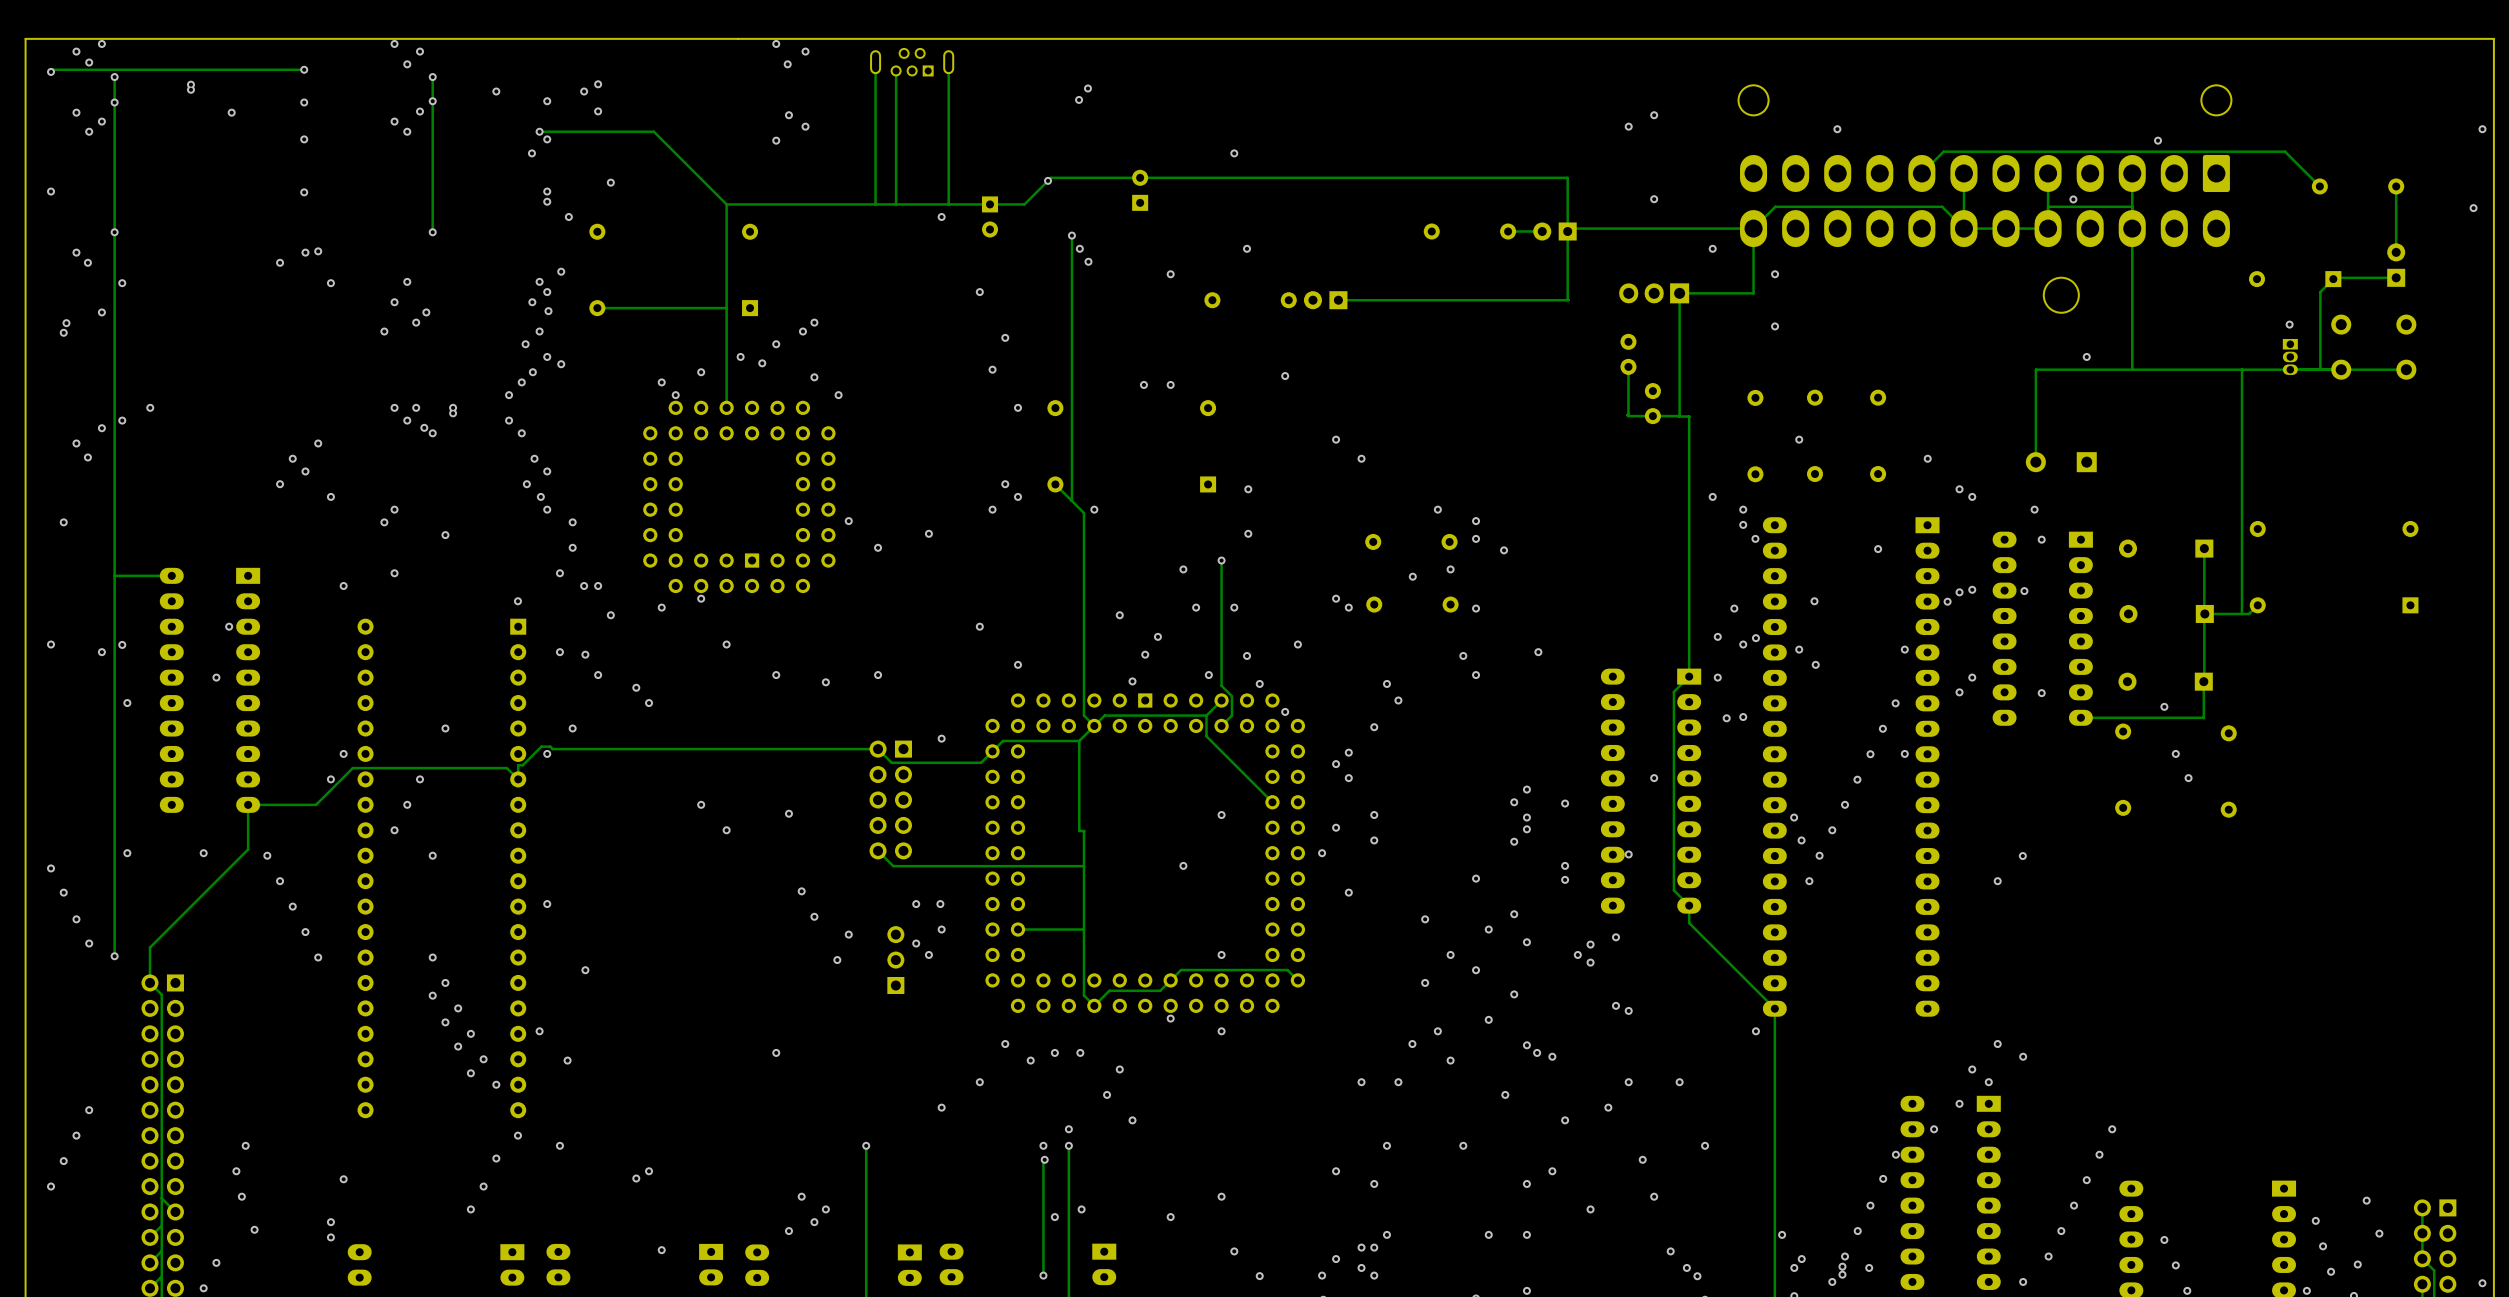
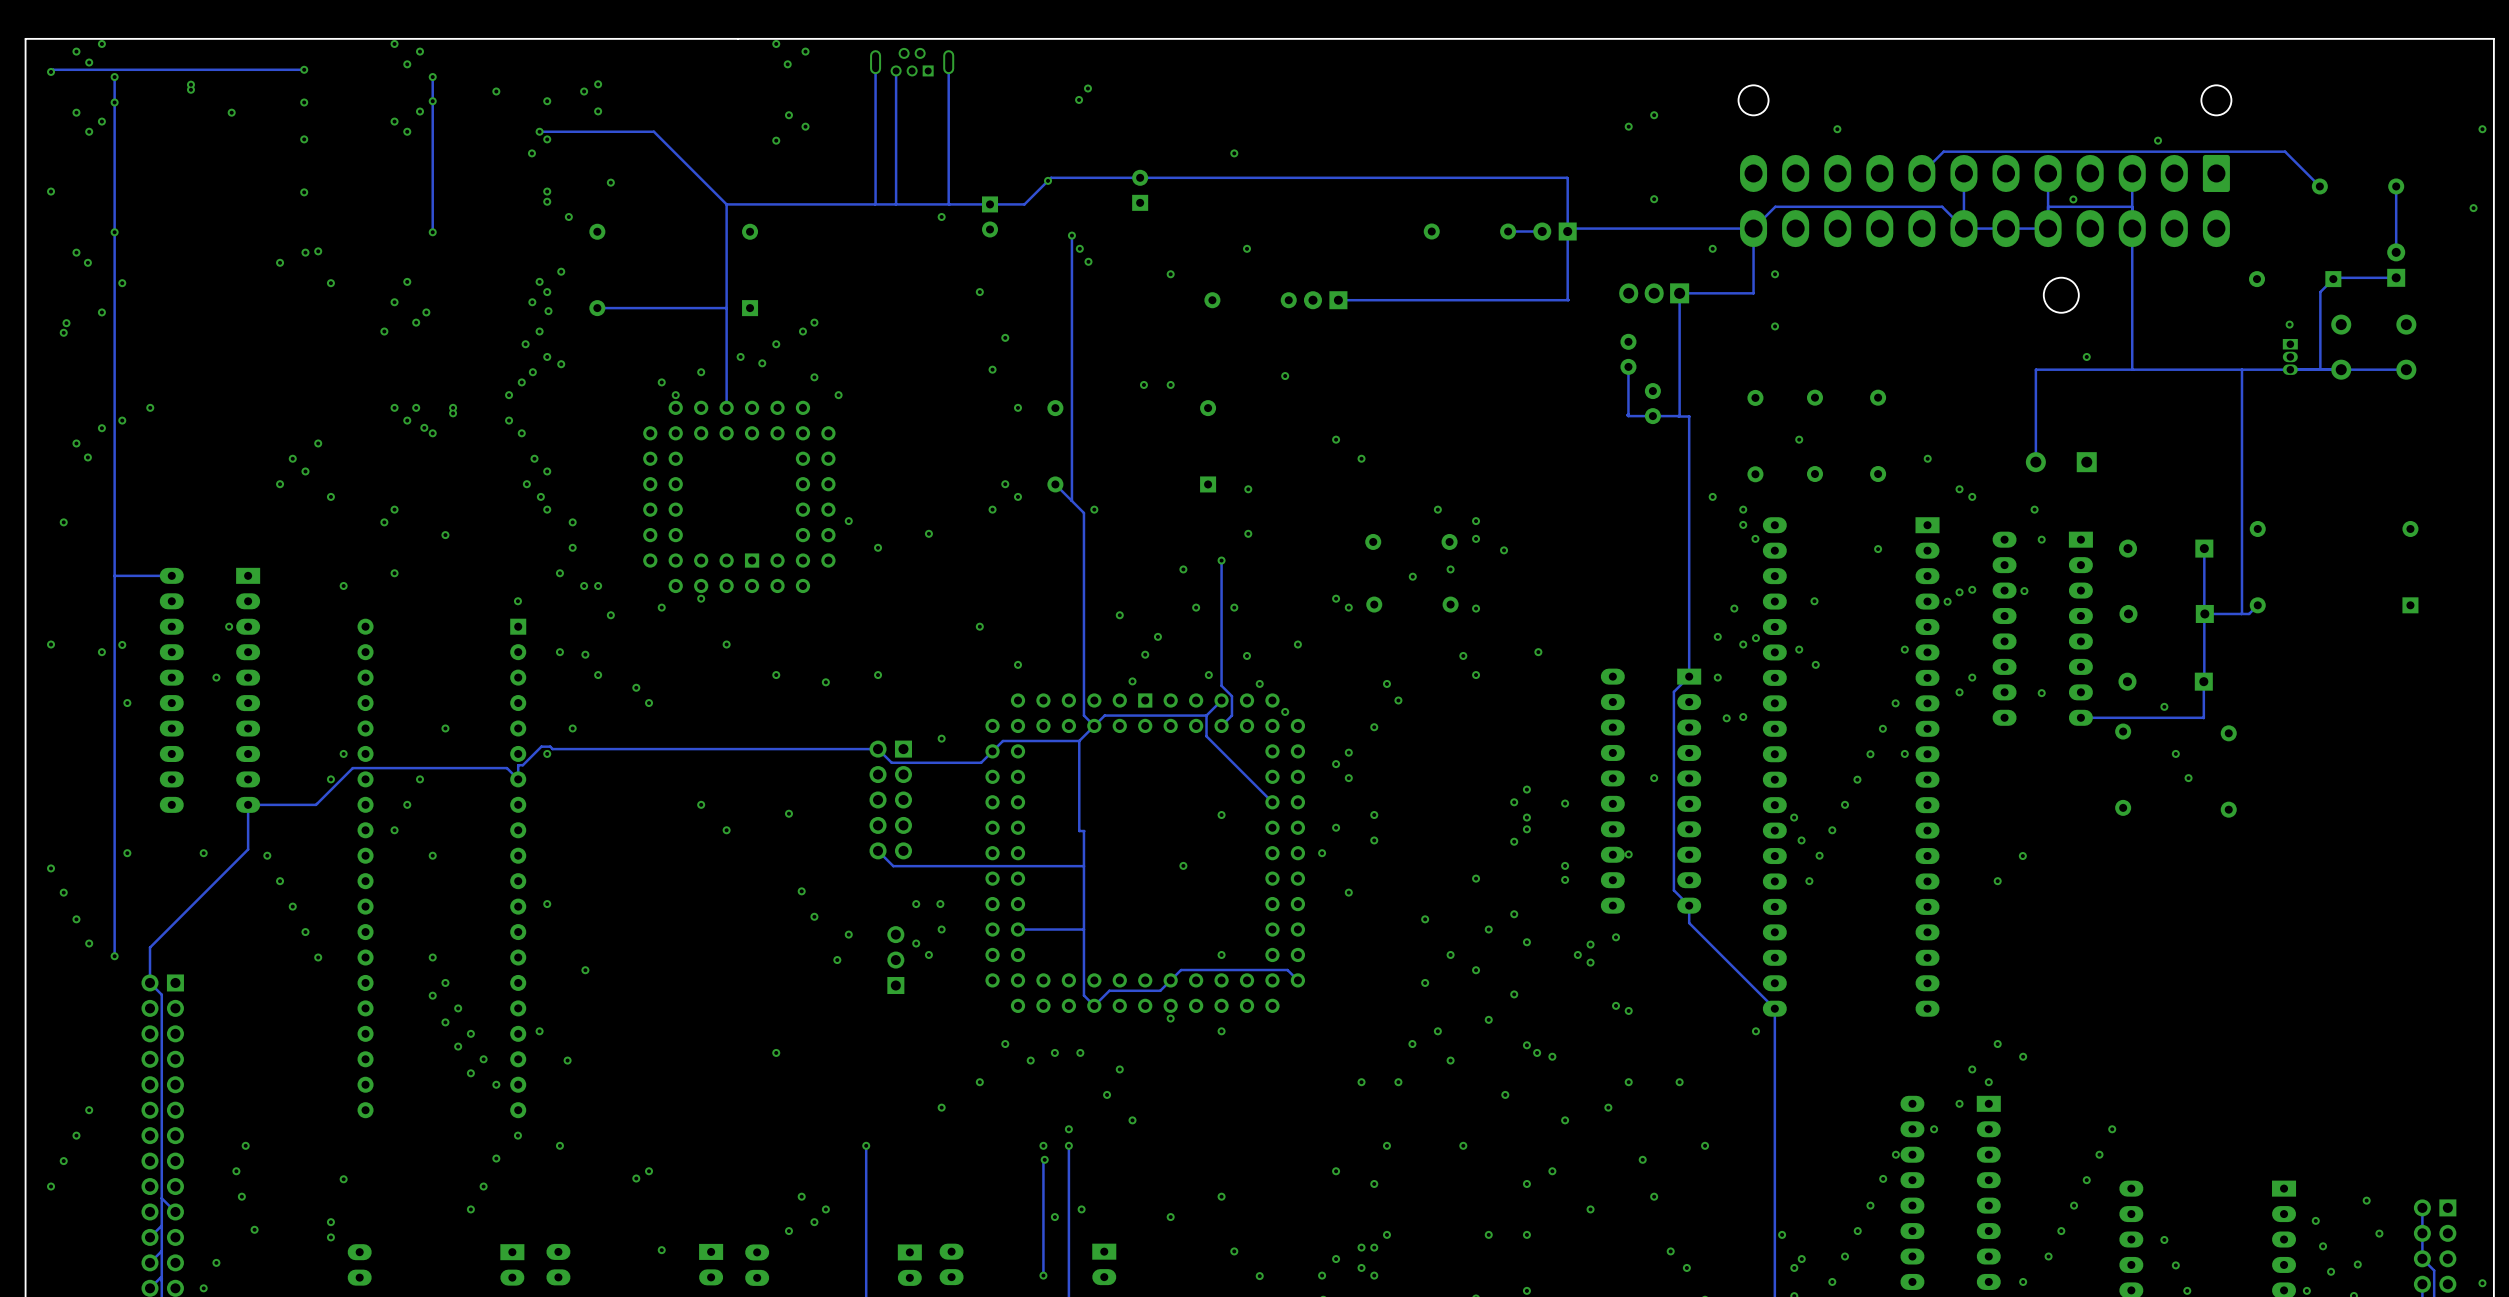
via: (1842, 1266) -> none
via: (1869, 1267) -> none
via: (1842, 1274) -> none
via: (1697, 1276) -> none

